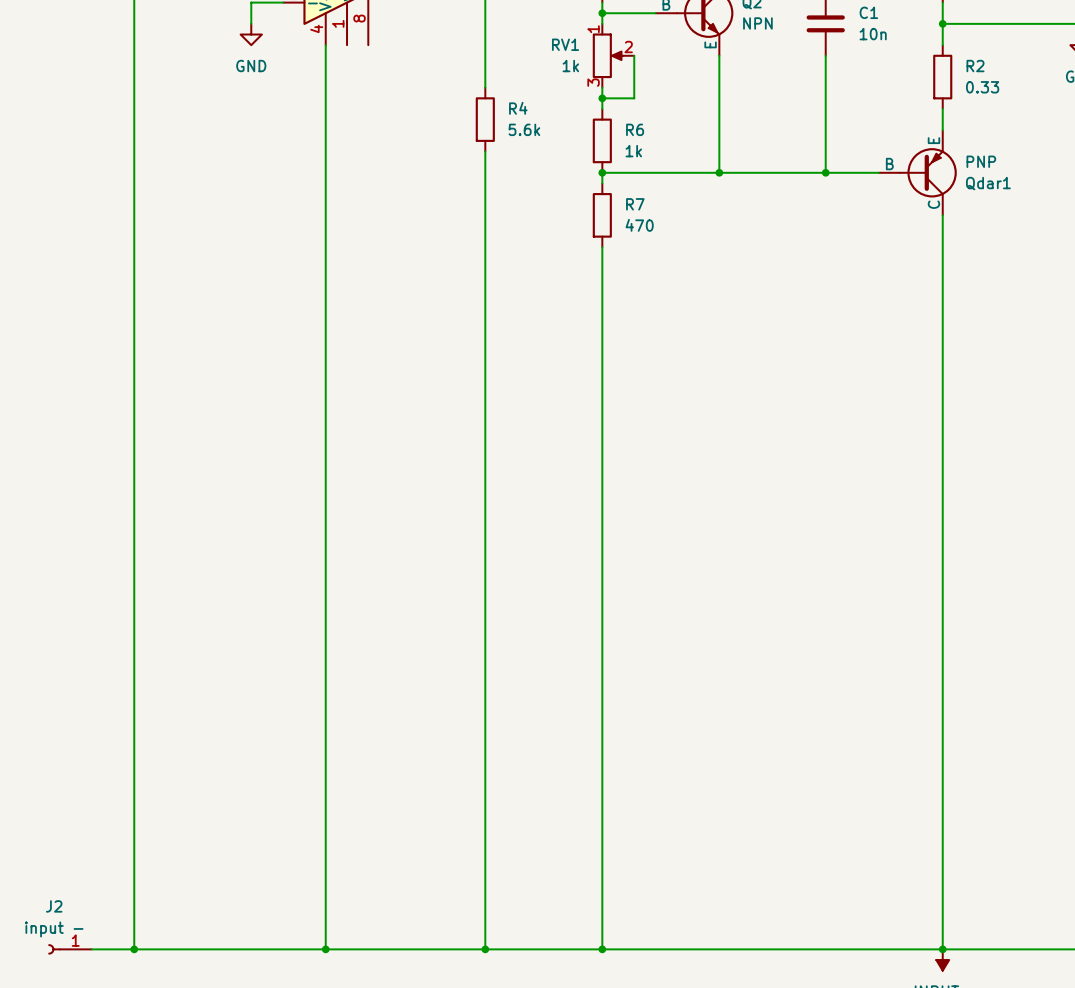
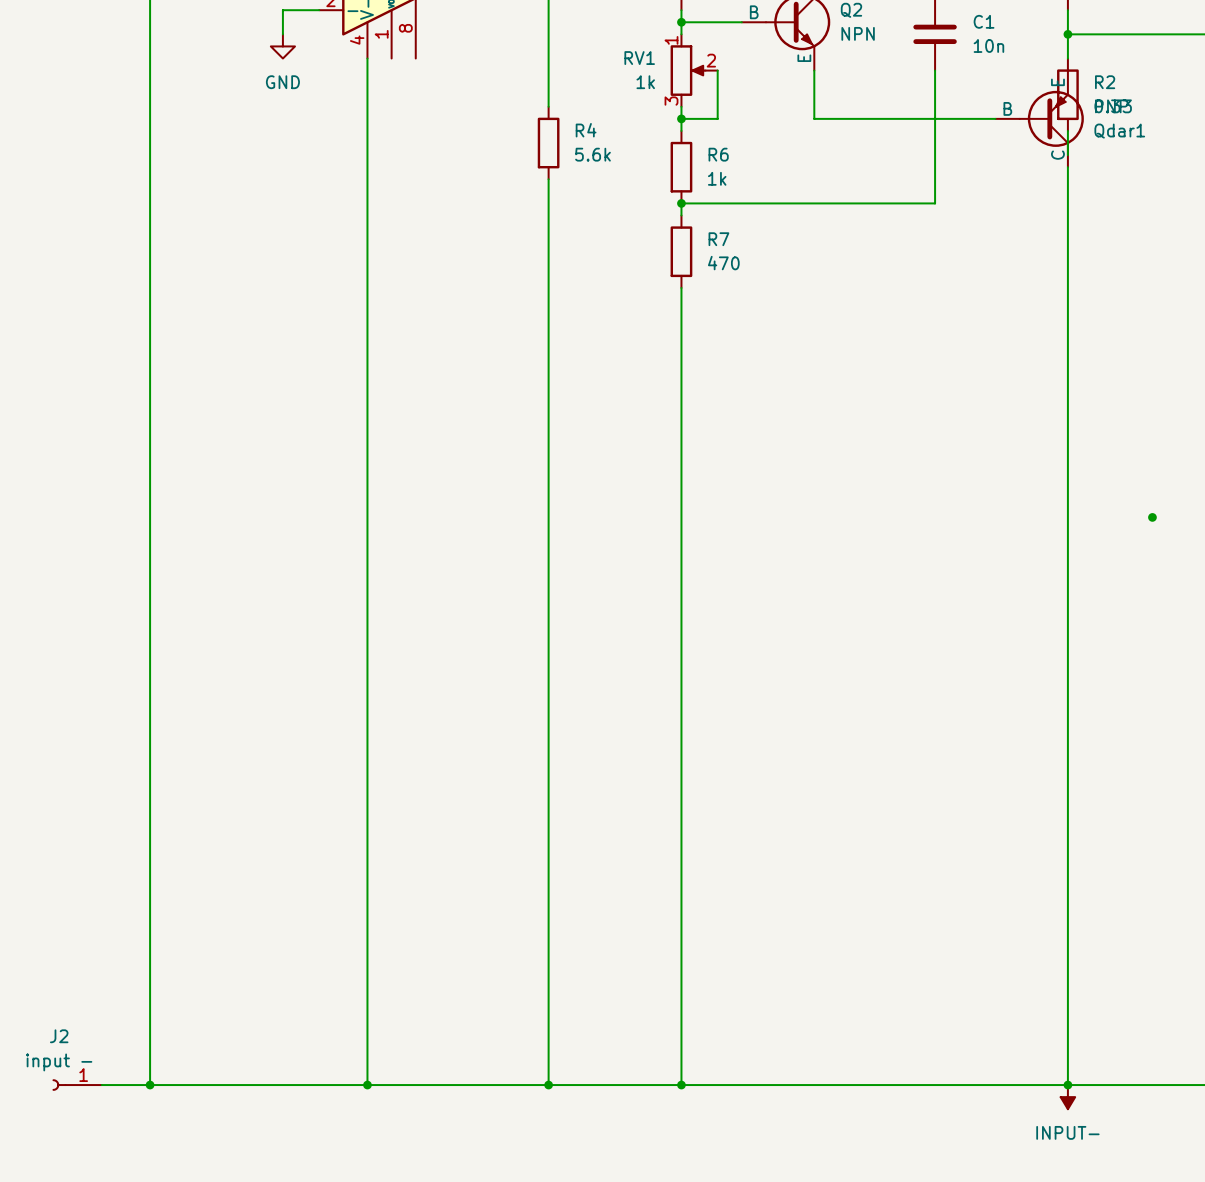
wire: (719, 98) (719, 172) -> (814, 118) (995, 118)
wire: none -> (1067, 167) (1067, 251)
junction: (719, 172) -> none
wire: (825, 172) (878, 172) -> none
junction: (825, 172) -> none
Qdar1 position: (917, 172) -> (1039, 118)
junction: none -> (1152, 517)

